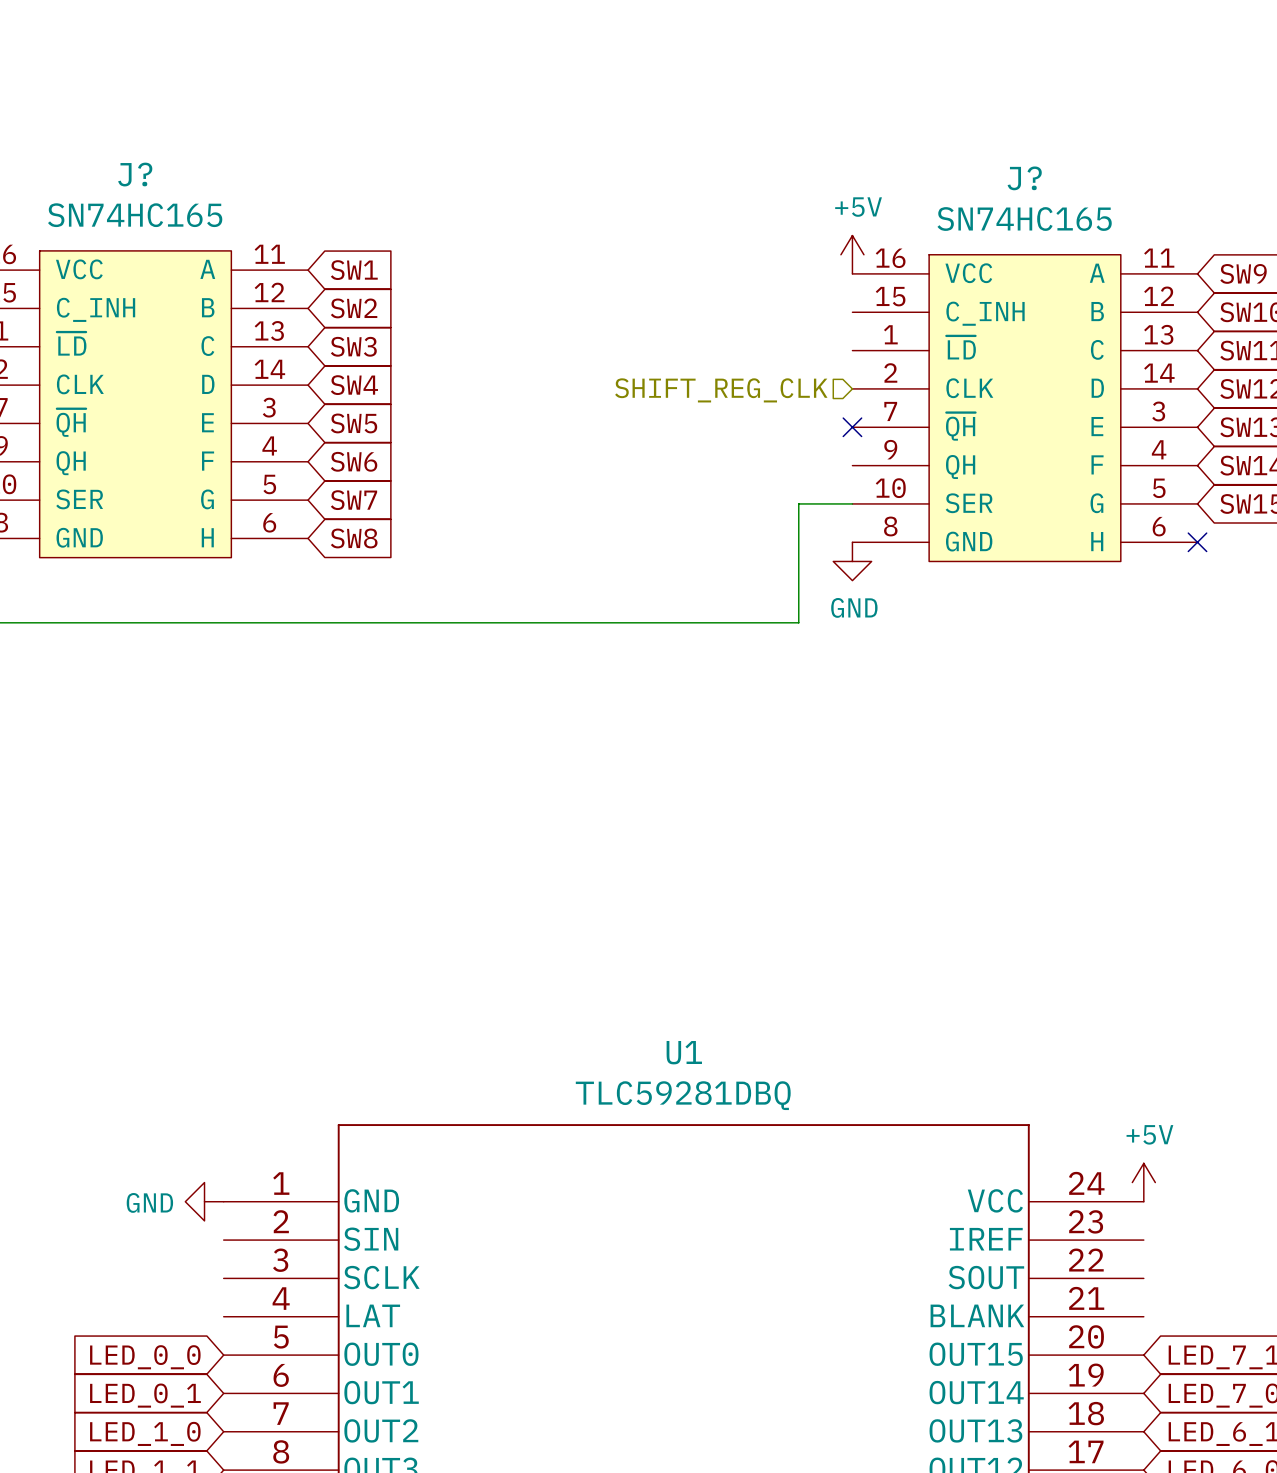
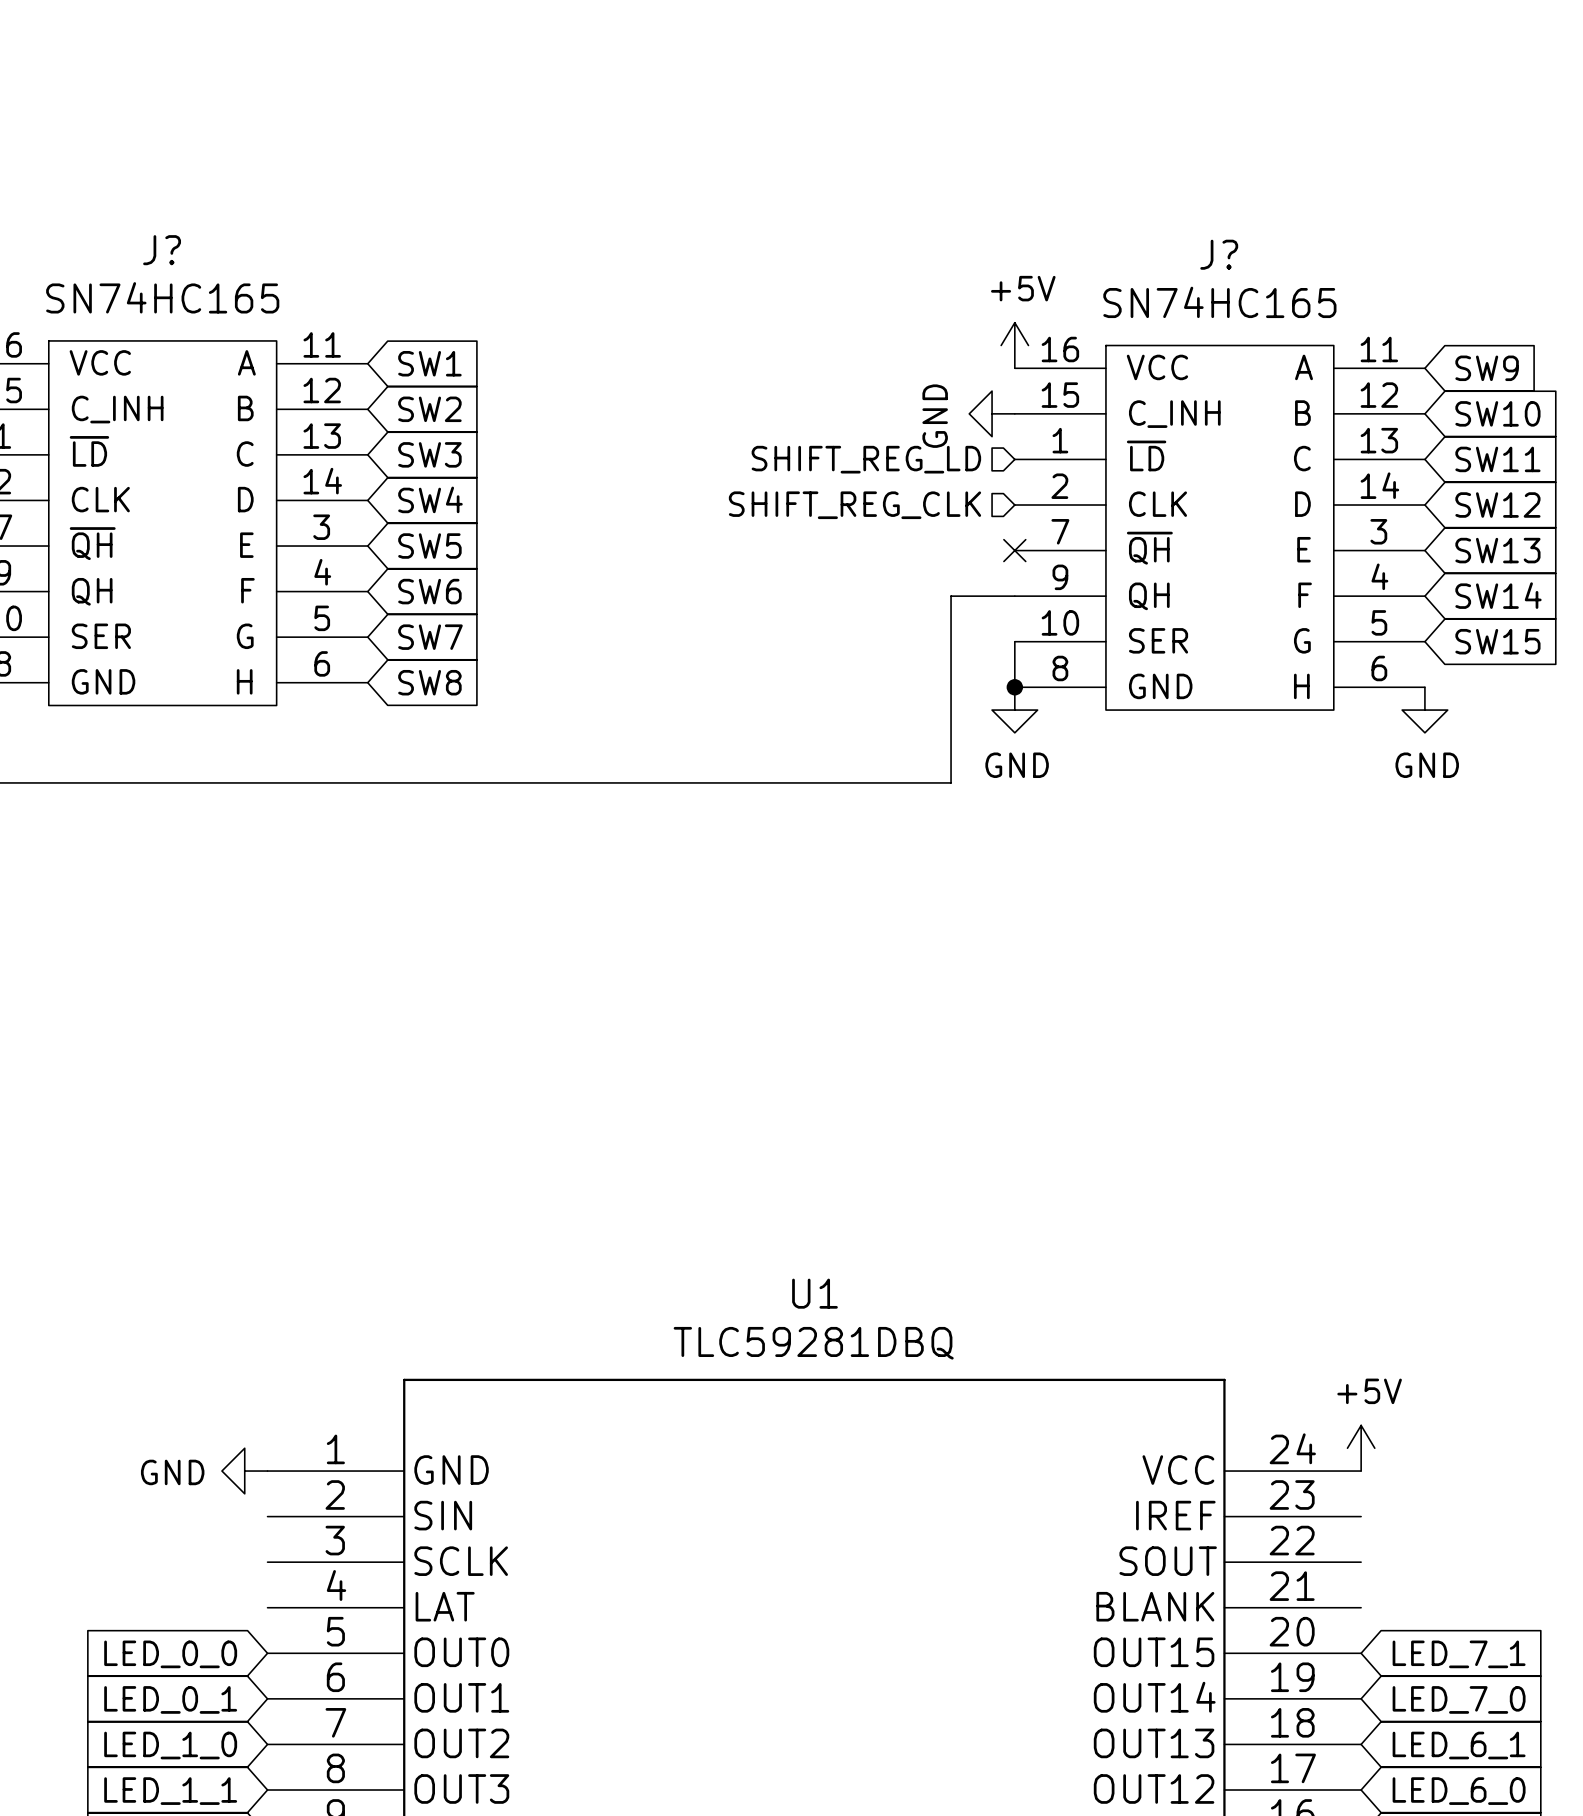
power symbol: none -> GND (992, 413)
hierarchical label: none -> SHIFT_REG_LD (866, 459)
wire: (798, 503) (852, 503) -> (951, 641) (951, 596) (1014, 596)
wire: none -> (1014, 641) (1014, 687)
junction: none -> (1014, 687)
no-connect mark: (1197, 542) -> none
power symbol: none -> GND (1424, 710)

